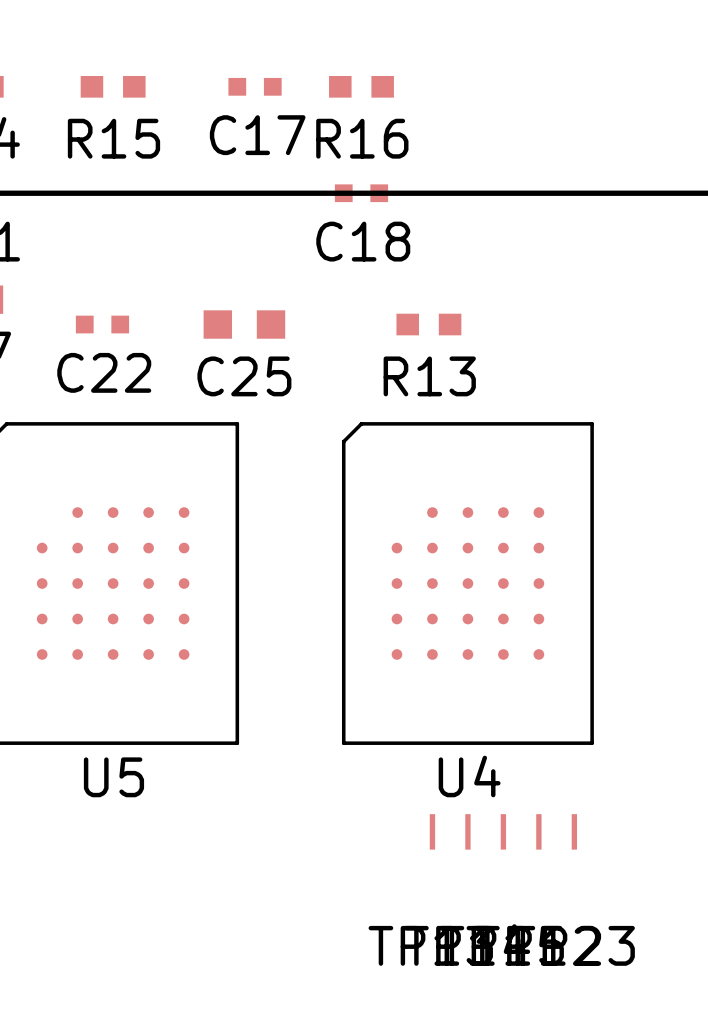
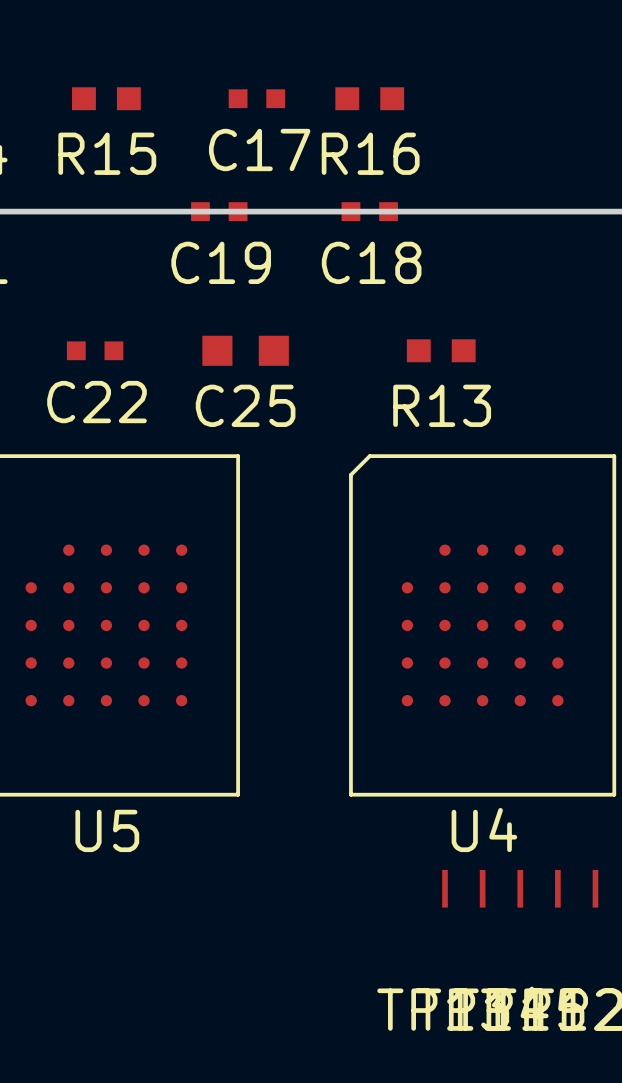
C19: none -> (219, 211)

